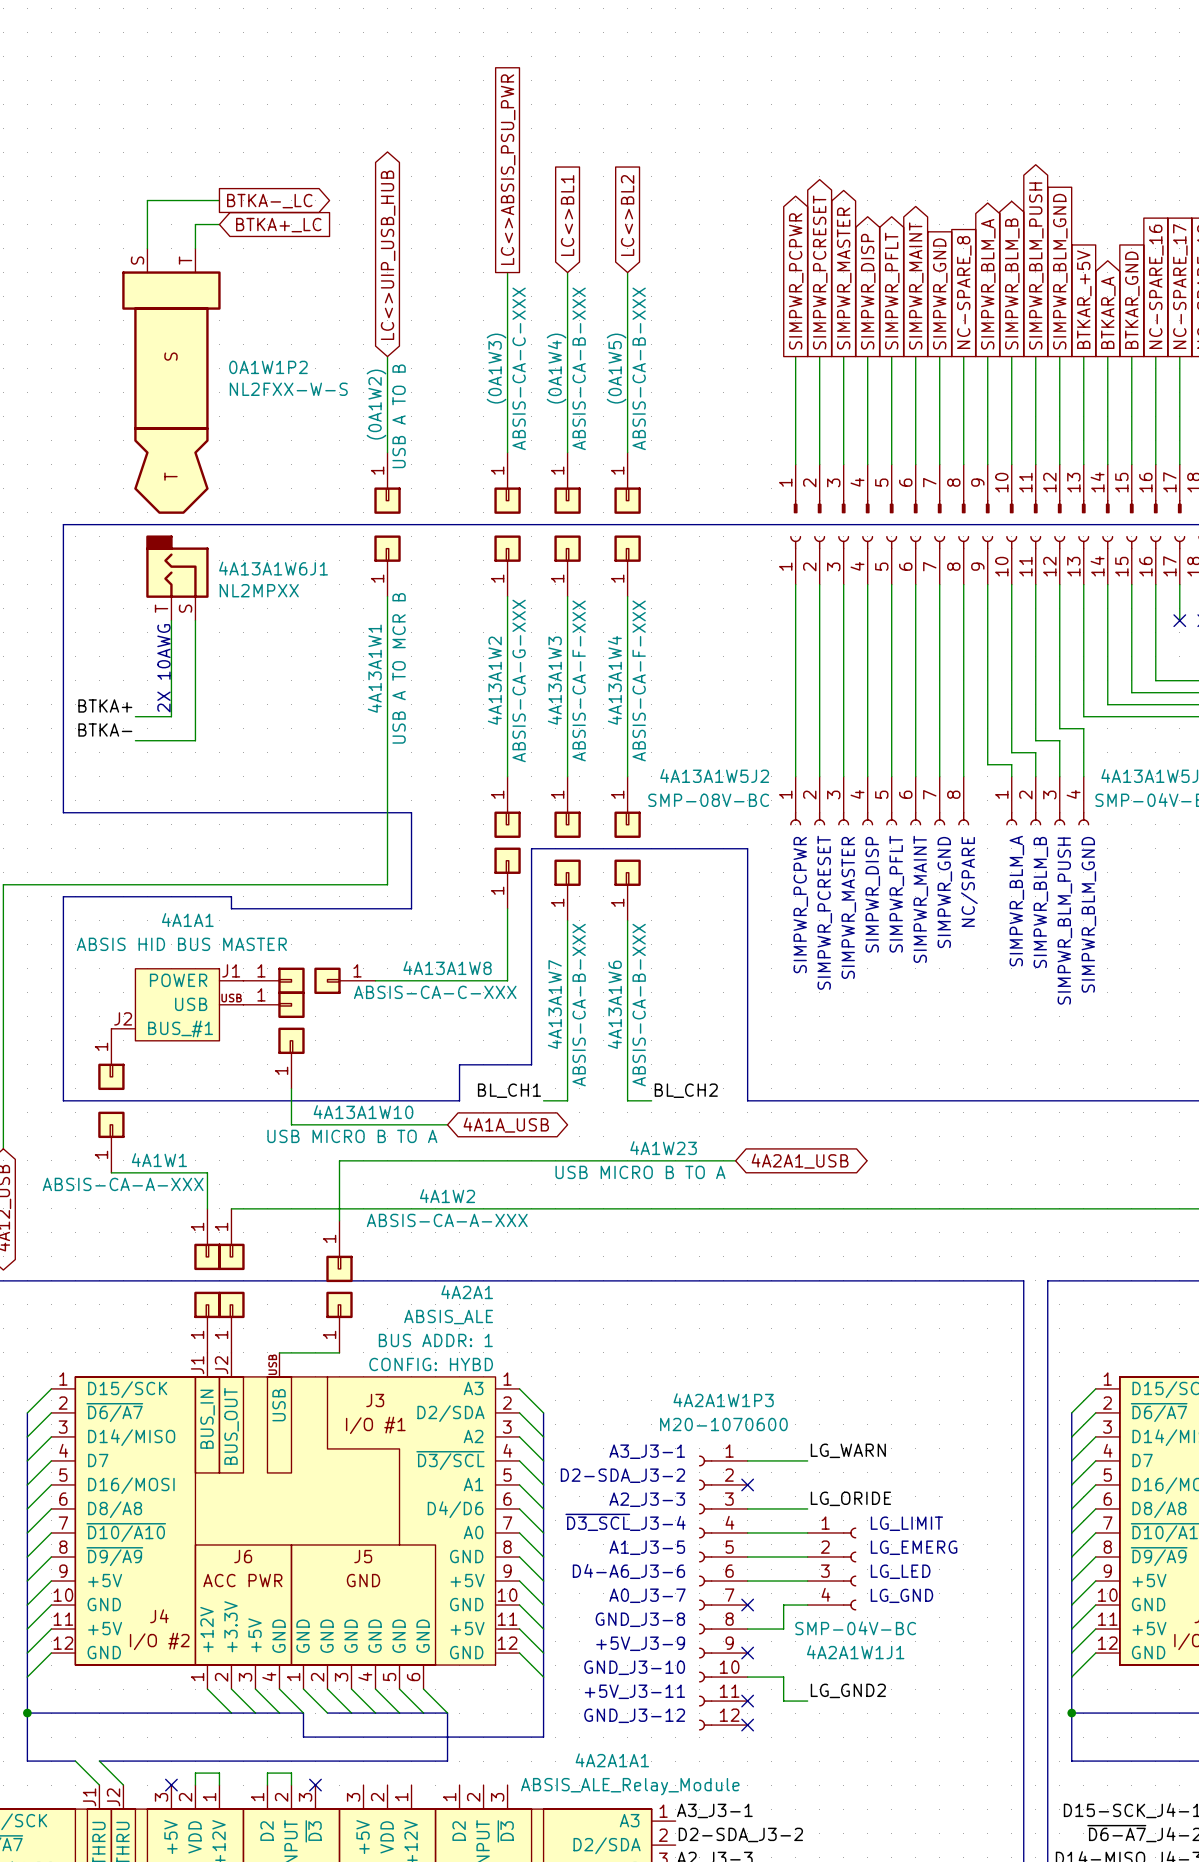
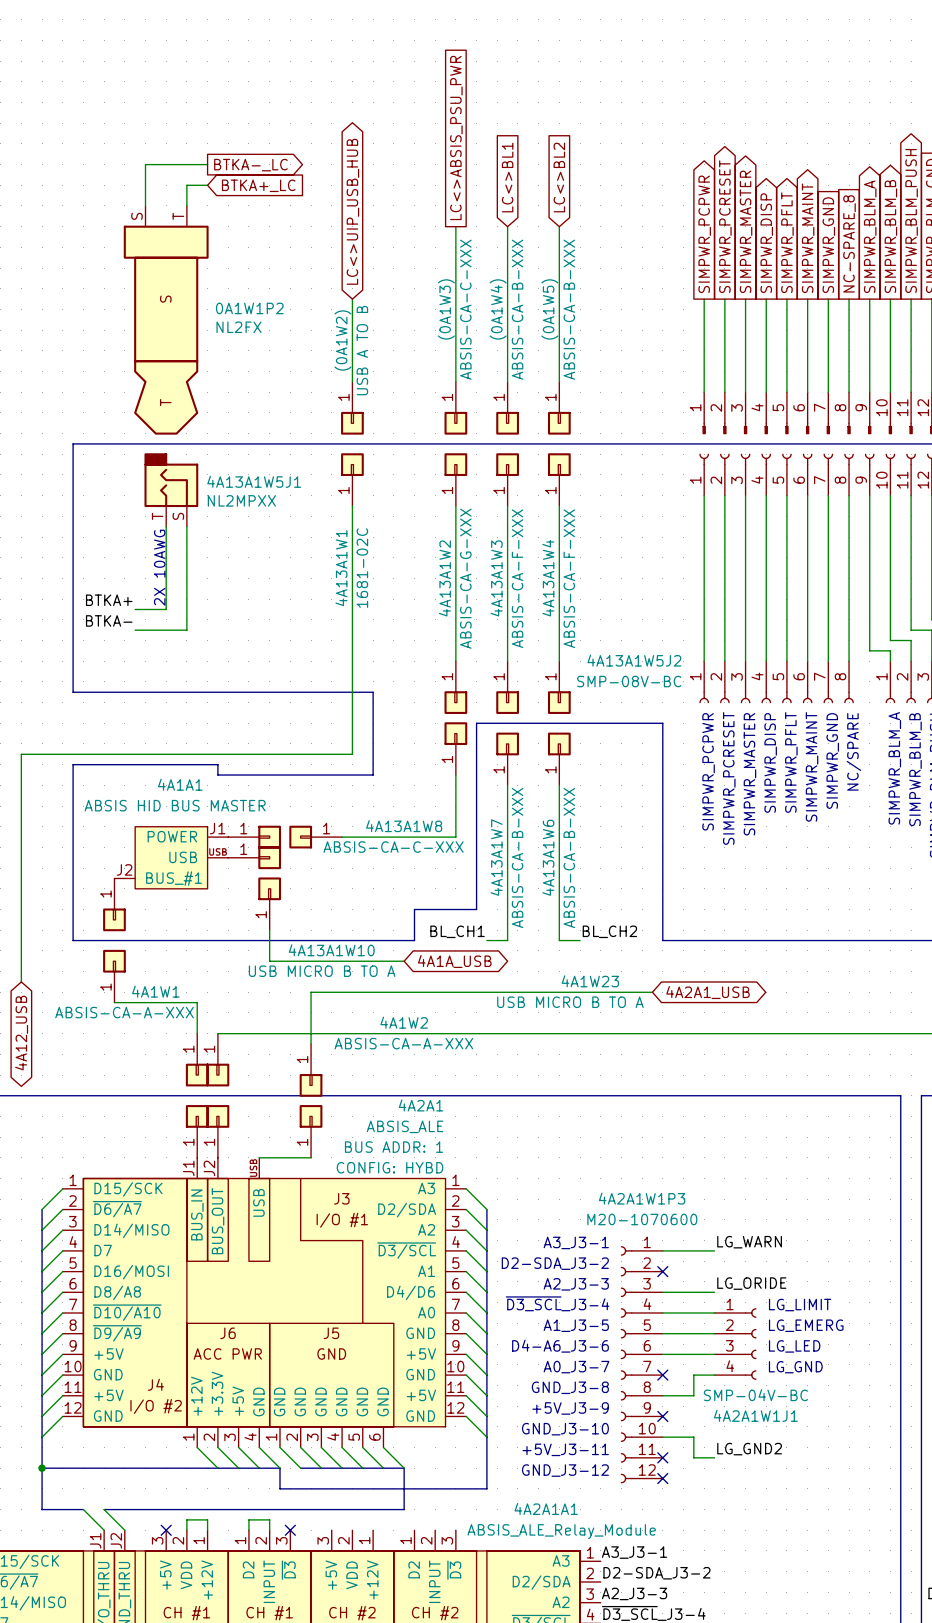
0A1W1P2 value: NL2FXX-W-S (288, 389) -> NL2FX (238, 327)
4A13A1W6J1 name: 4A13A1W6J1 (273, 568) -> 4A13A1W5J1 (254, 481)
4A13A1W1 value: USB A TO MCR B (399, 668) -> 1681-02C (362, 568)

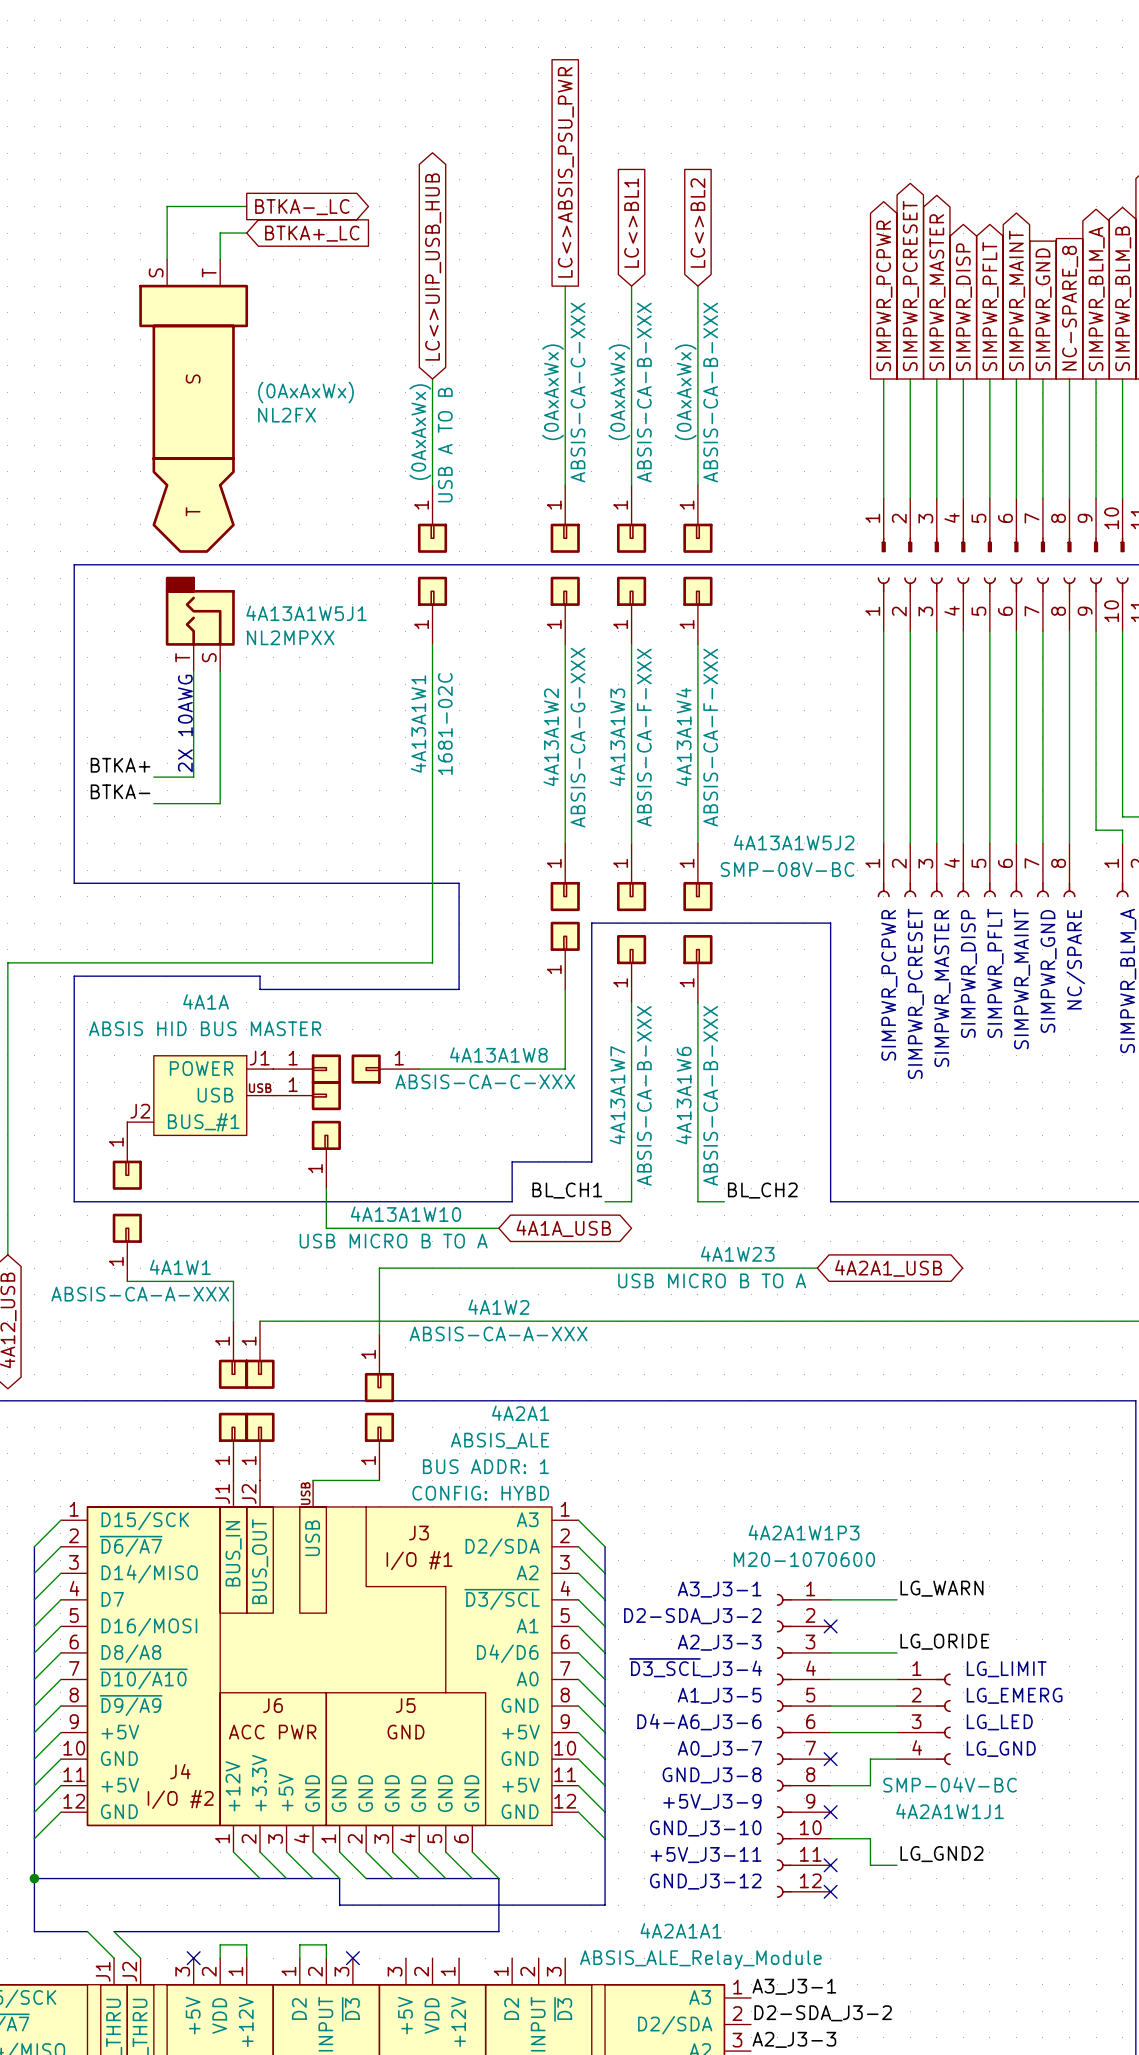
0A1W1P2 name: 0A1W1P2 (249, 308) -> (0AxAxWx) (305, 392)
(0A1W3) name: (0A1W3) (446, 309) -> (0AxAxWx) (553, 392)
(0A1W4) name: (0A1W4) (498, 309) -> (0AxAxWx) (619, 392)
(0A1W5) name: (0A1W5) (549, 309) -> (0AxAxWx) (685, 392)
(0A1W2) name: (0A1W2) (342, 340) -> (0AxAxWx) (420, 432)
4A1A1 name: 4A1A1 (180, 784) -> 4A1A (206, 1001)

